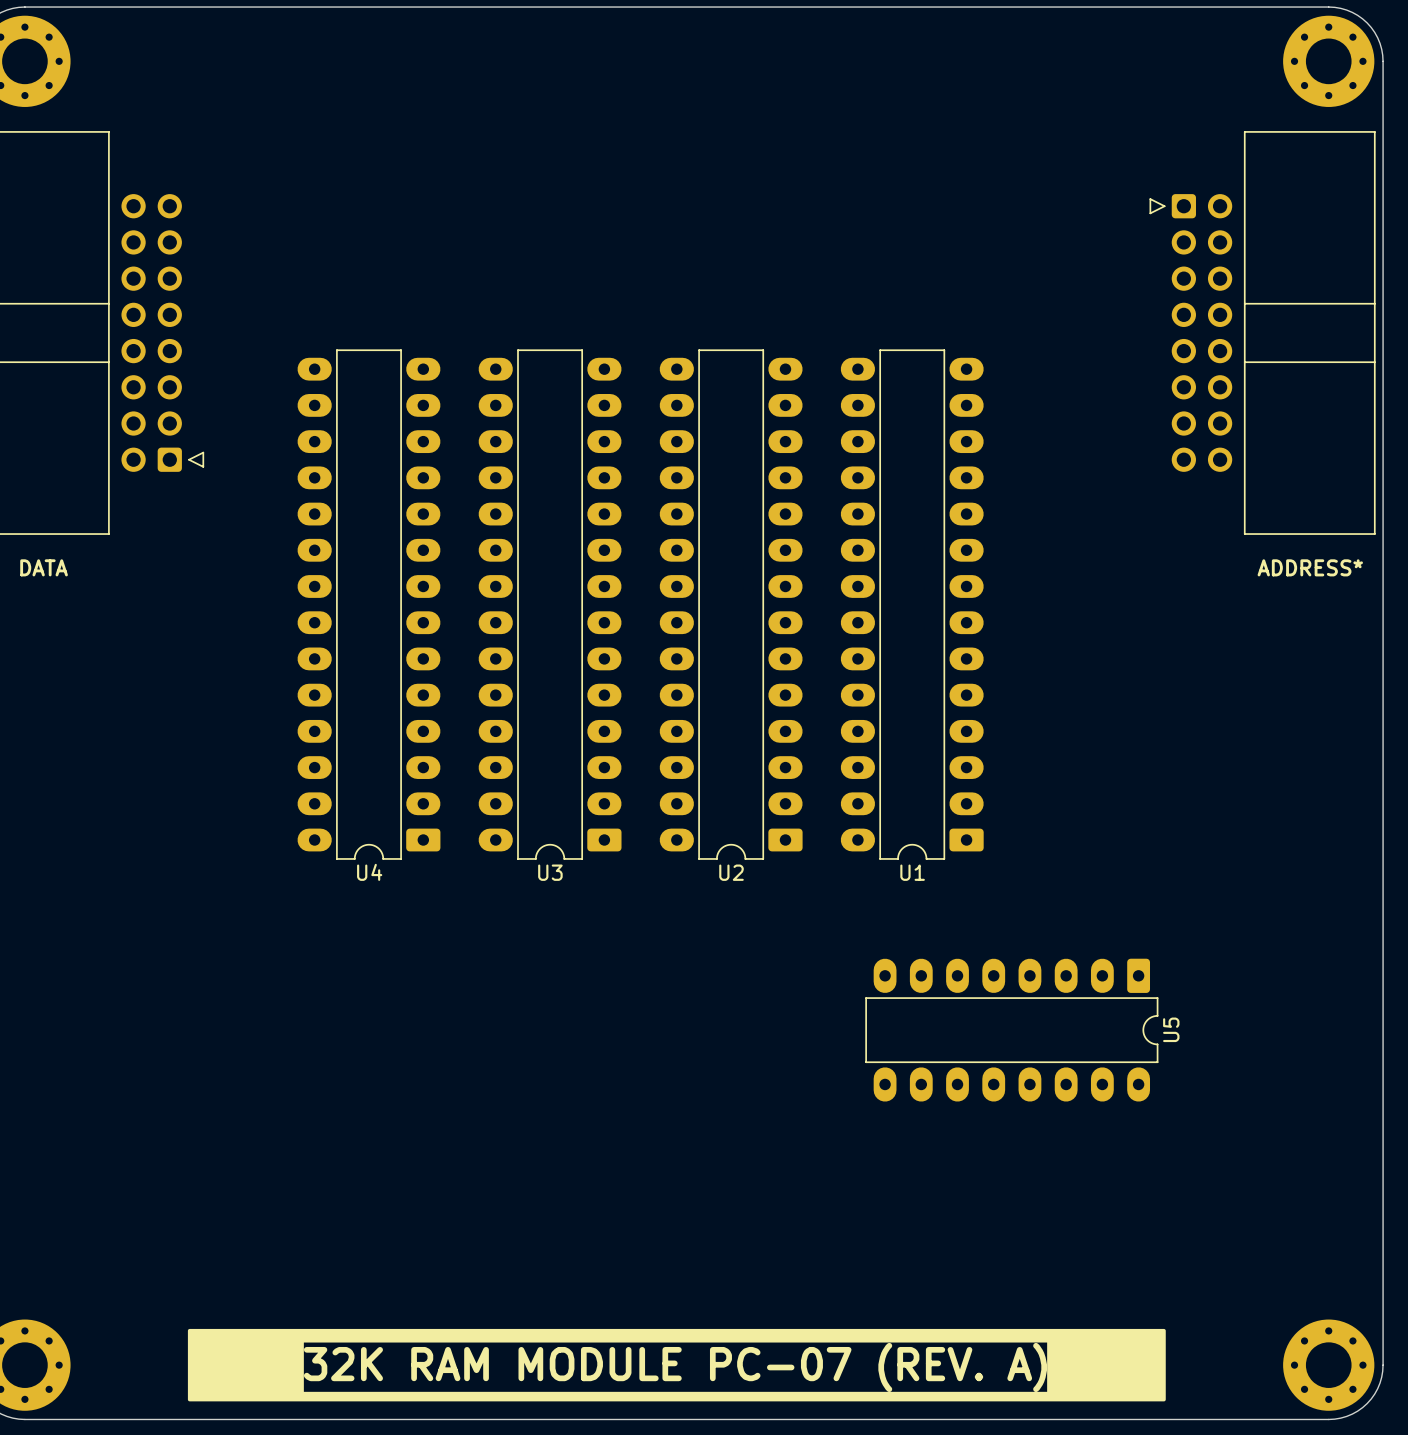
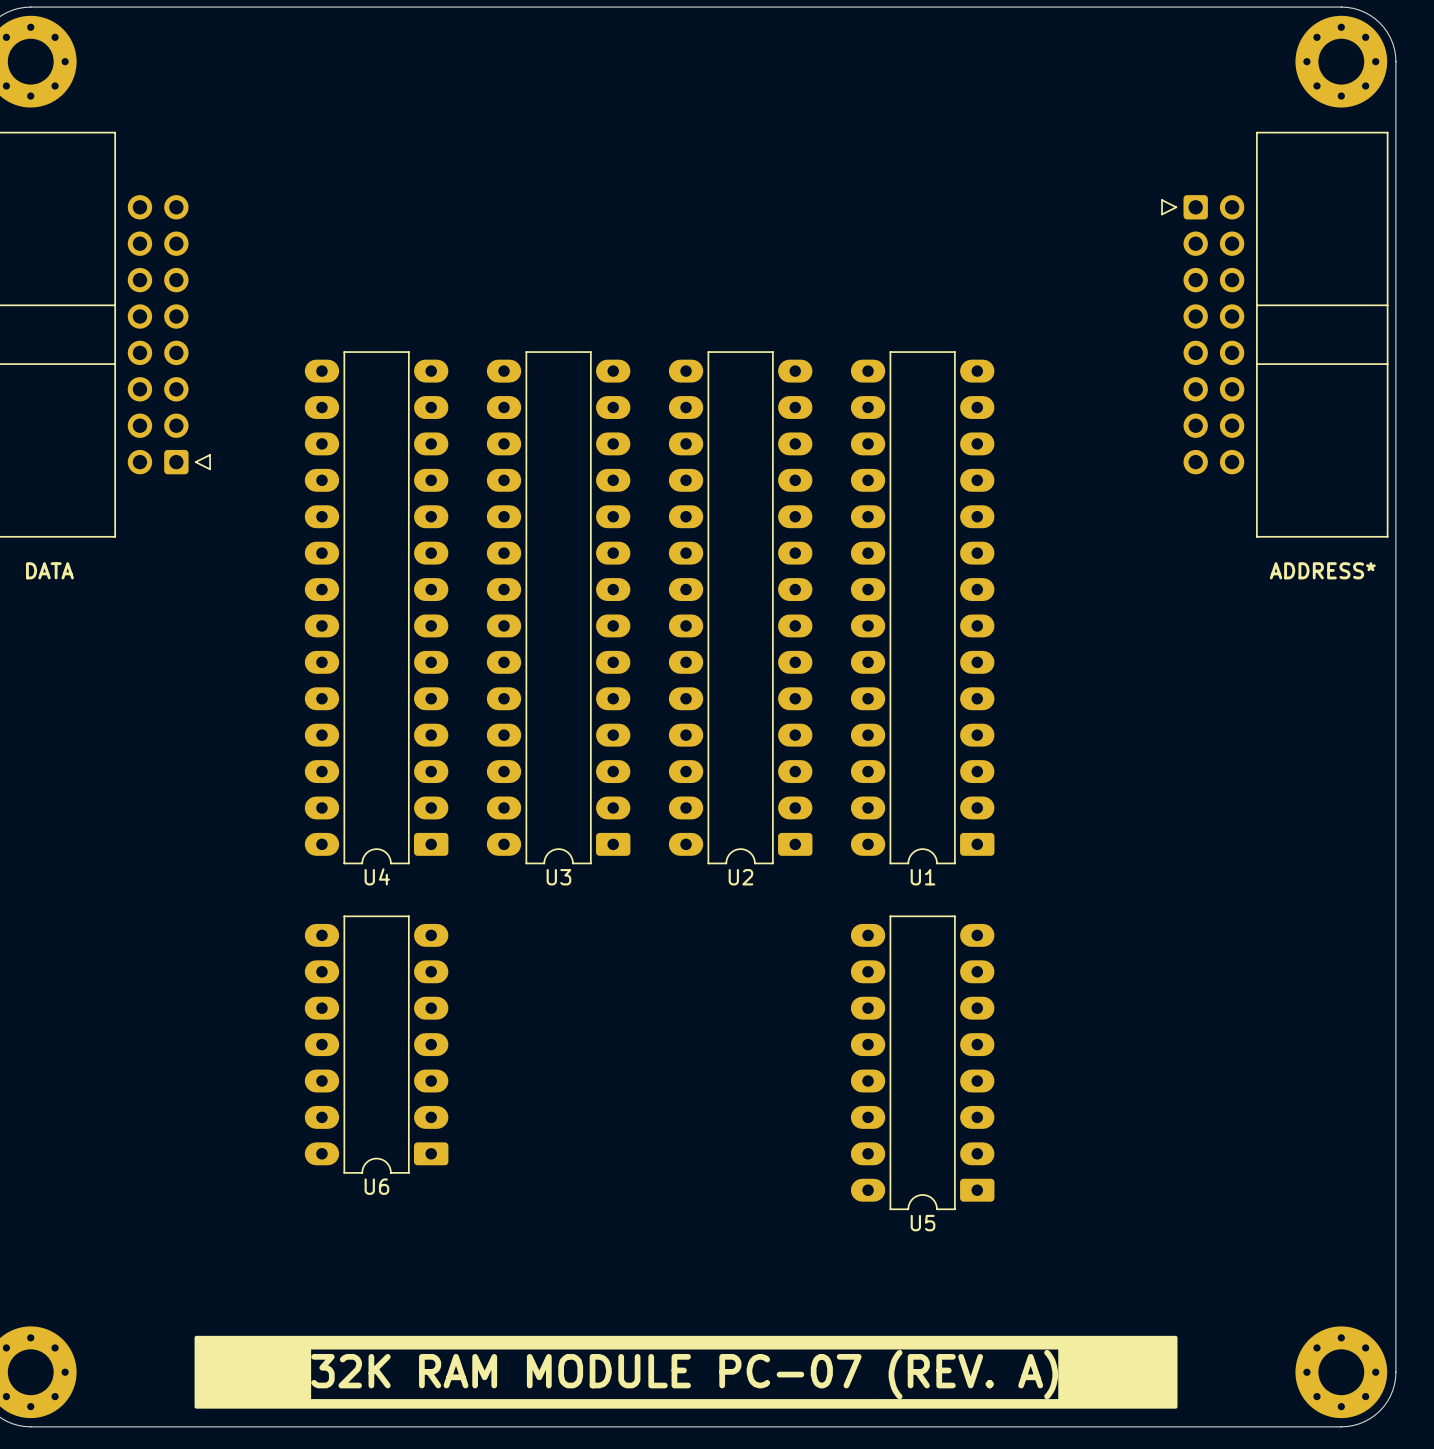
U5 rotation: 0° (1011, 1030) -> 90° clockwise (922, 1062)
U6: none -> (376, 1044)

